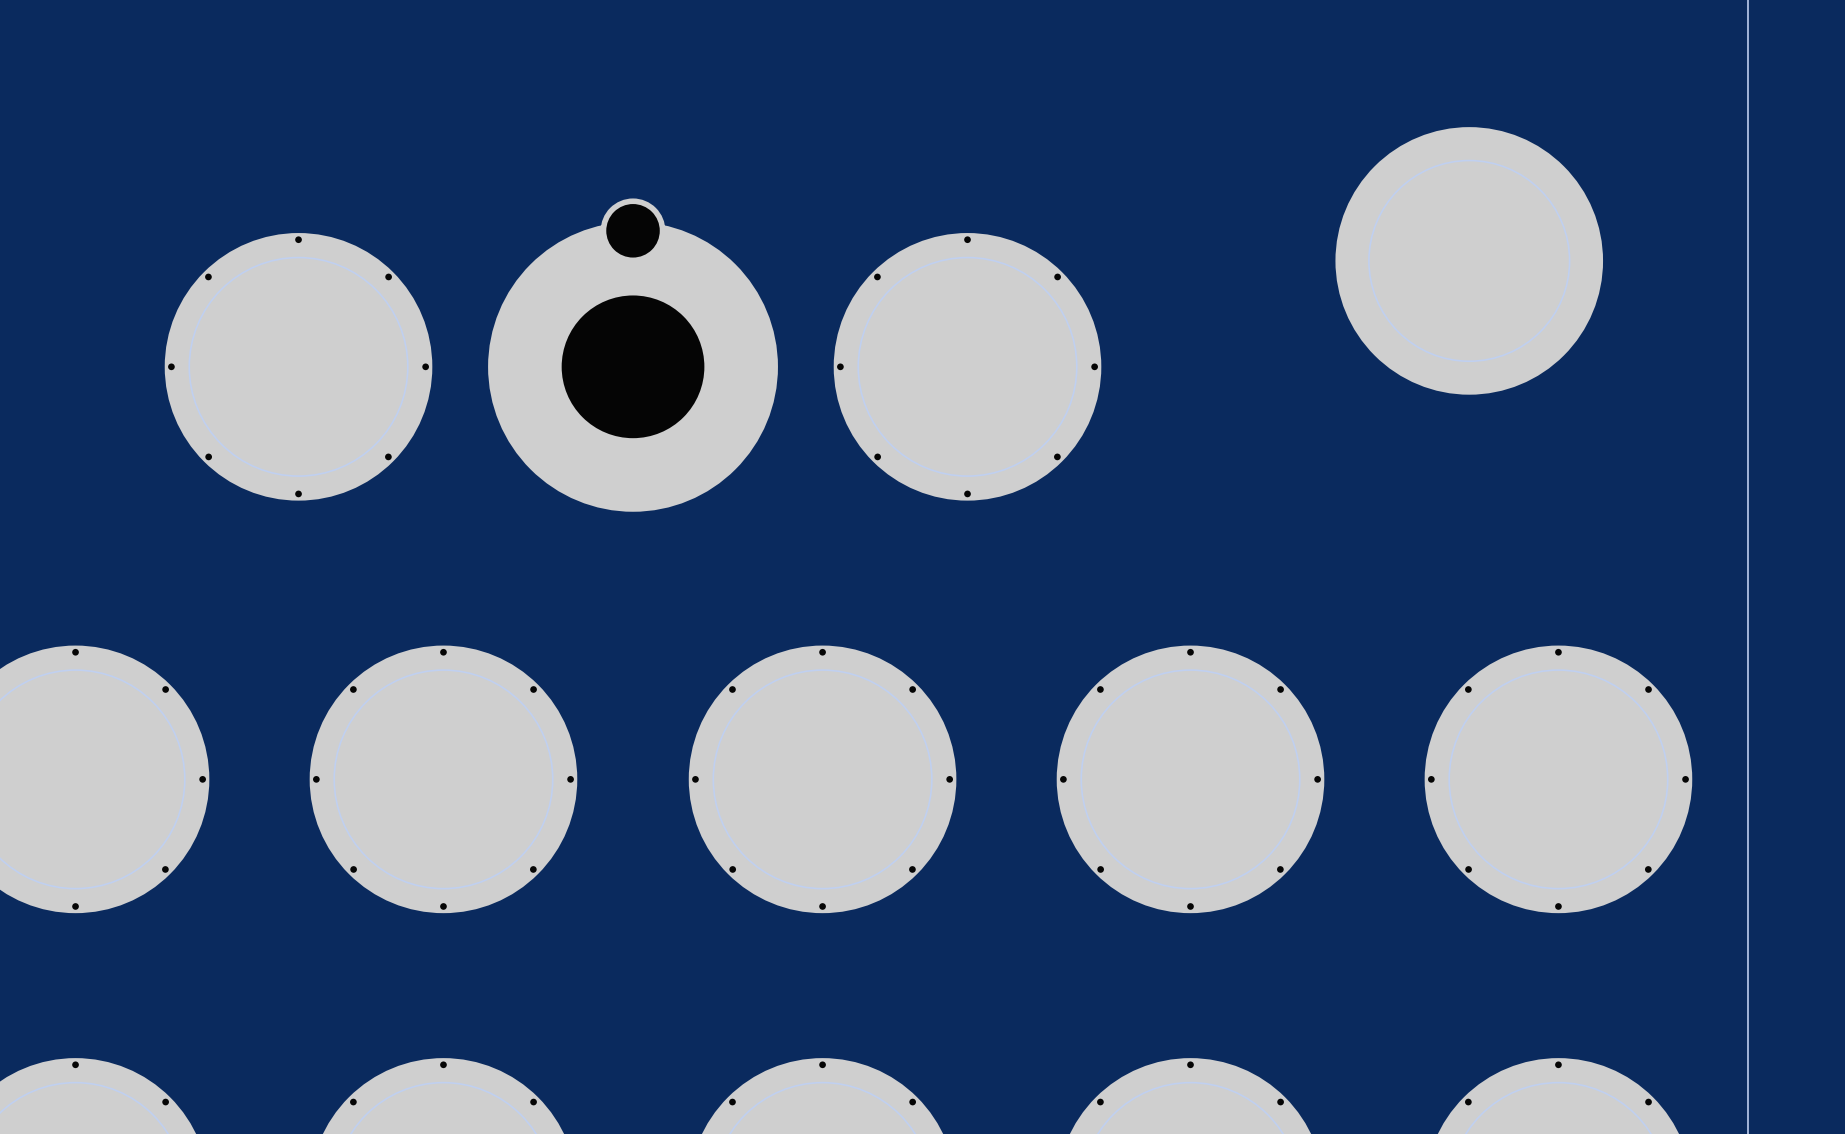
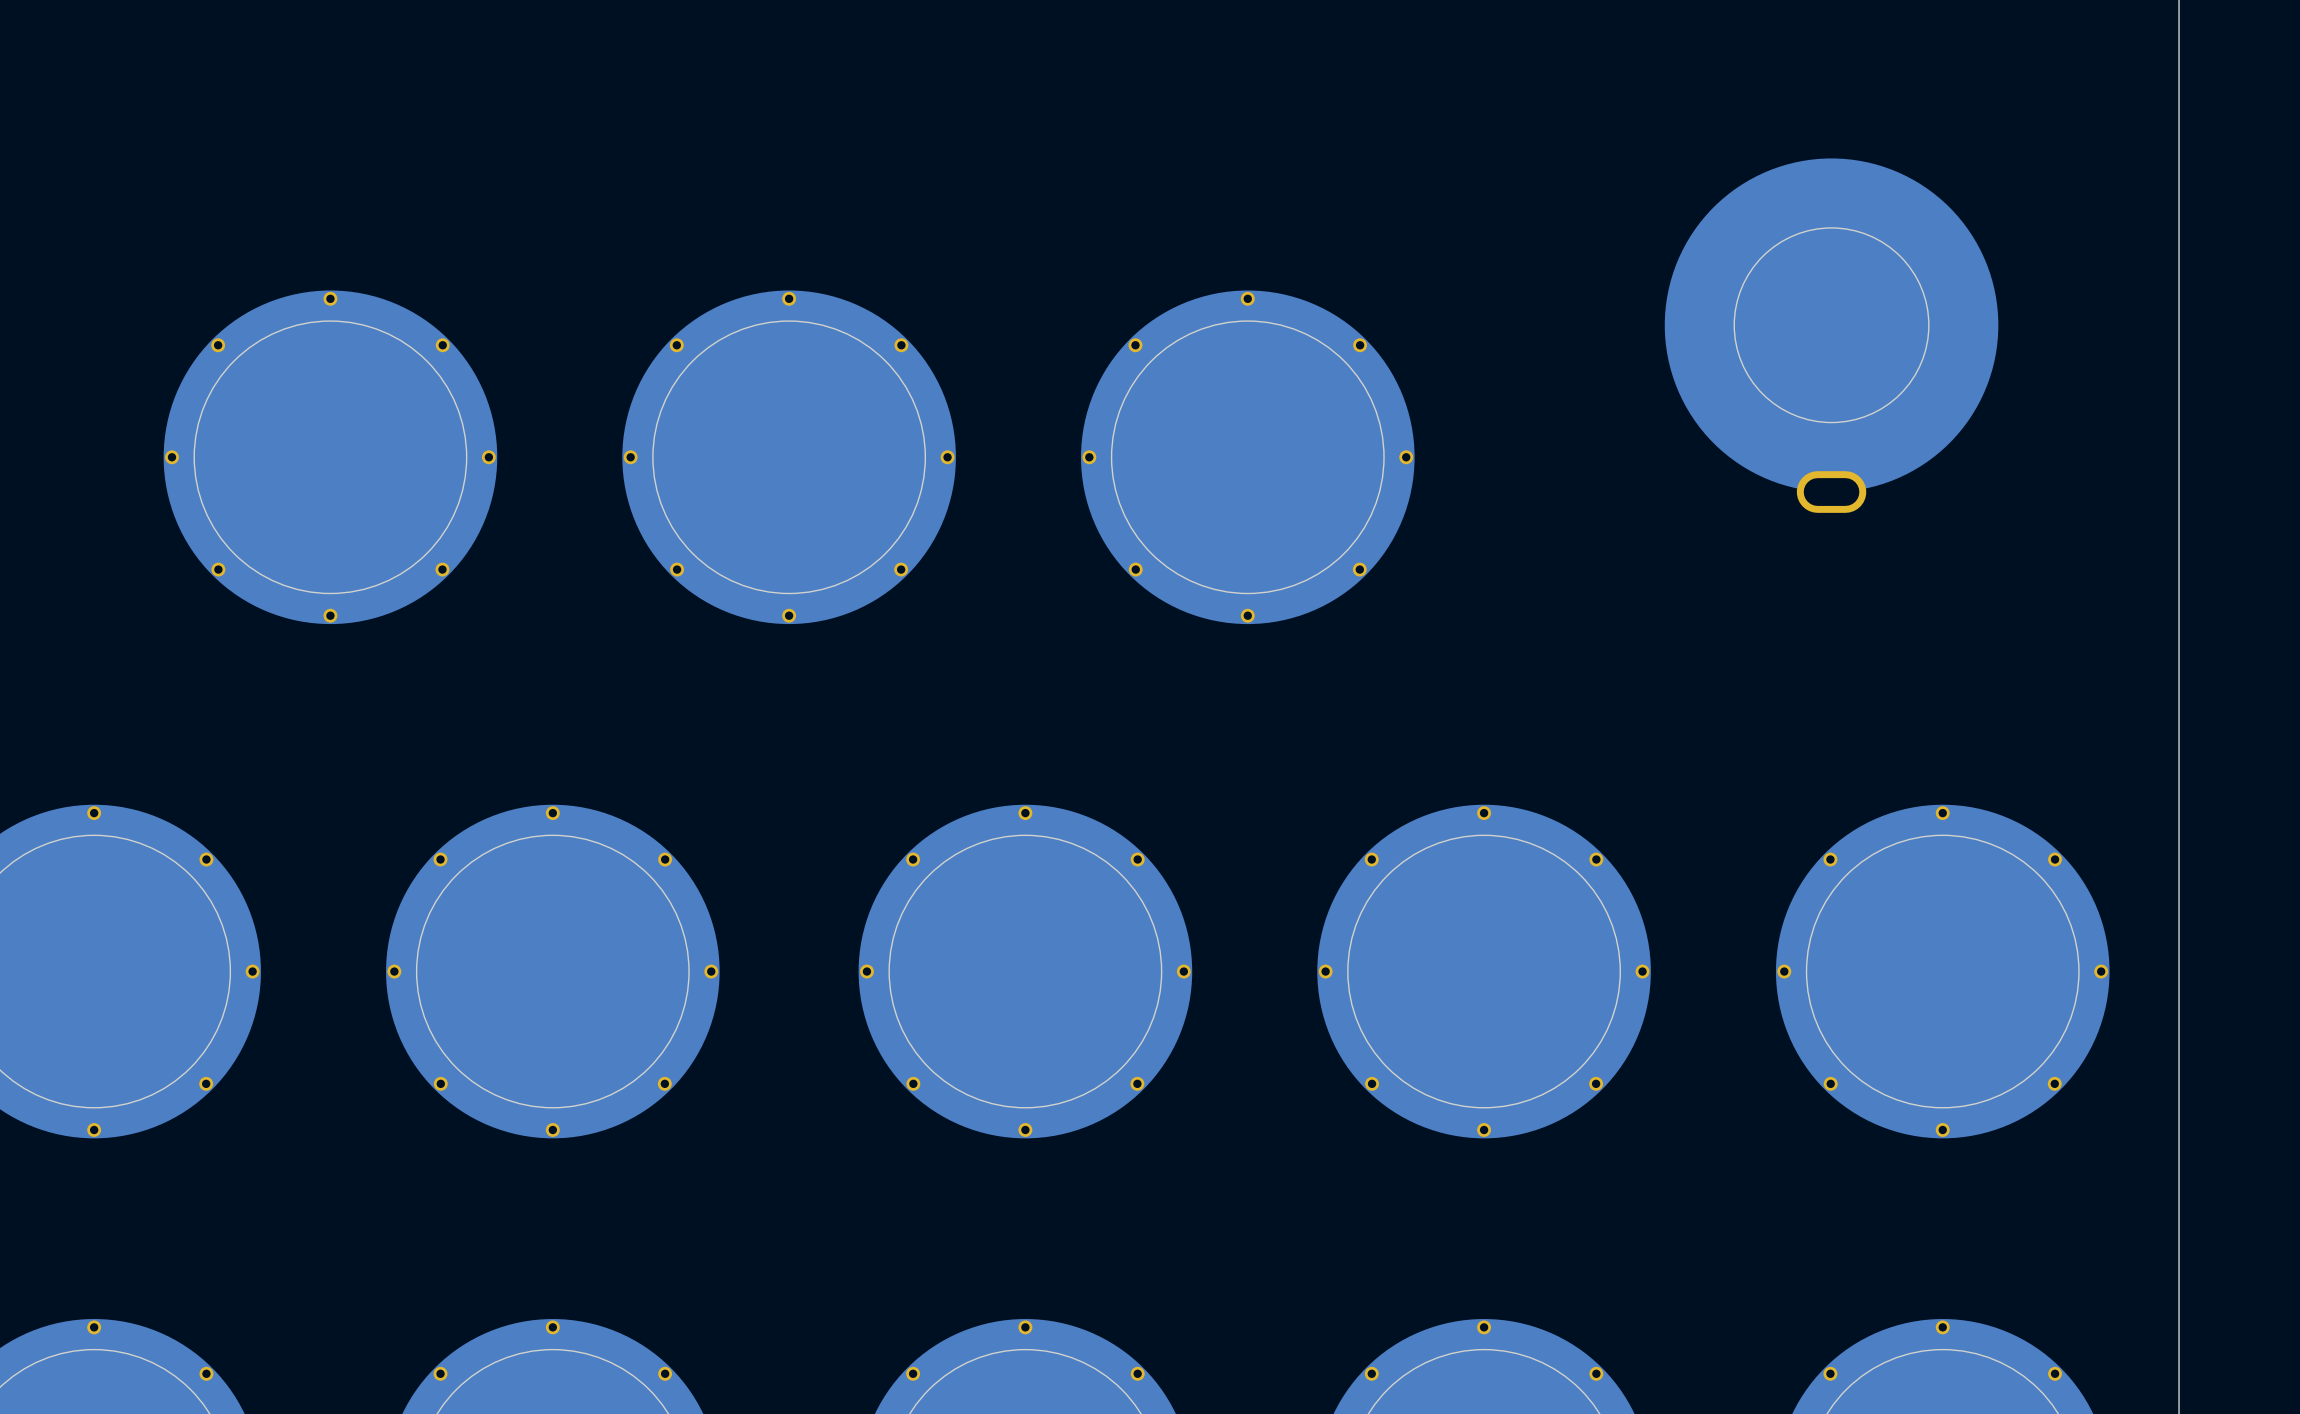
part footprint: [1335, 127, 1604, 395] -> [1664, 158, 1999, 513]
part footprint: [488, 198, 778, 512] -> [622, 290, 956, 625]
part position: (298, 366) -> (330, 457)
part position: (967, 366) -> (1247, 457)

